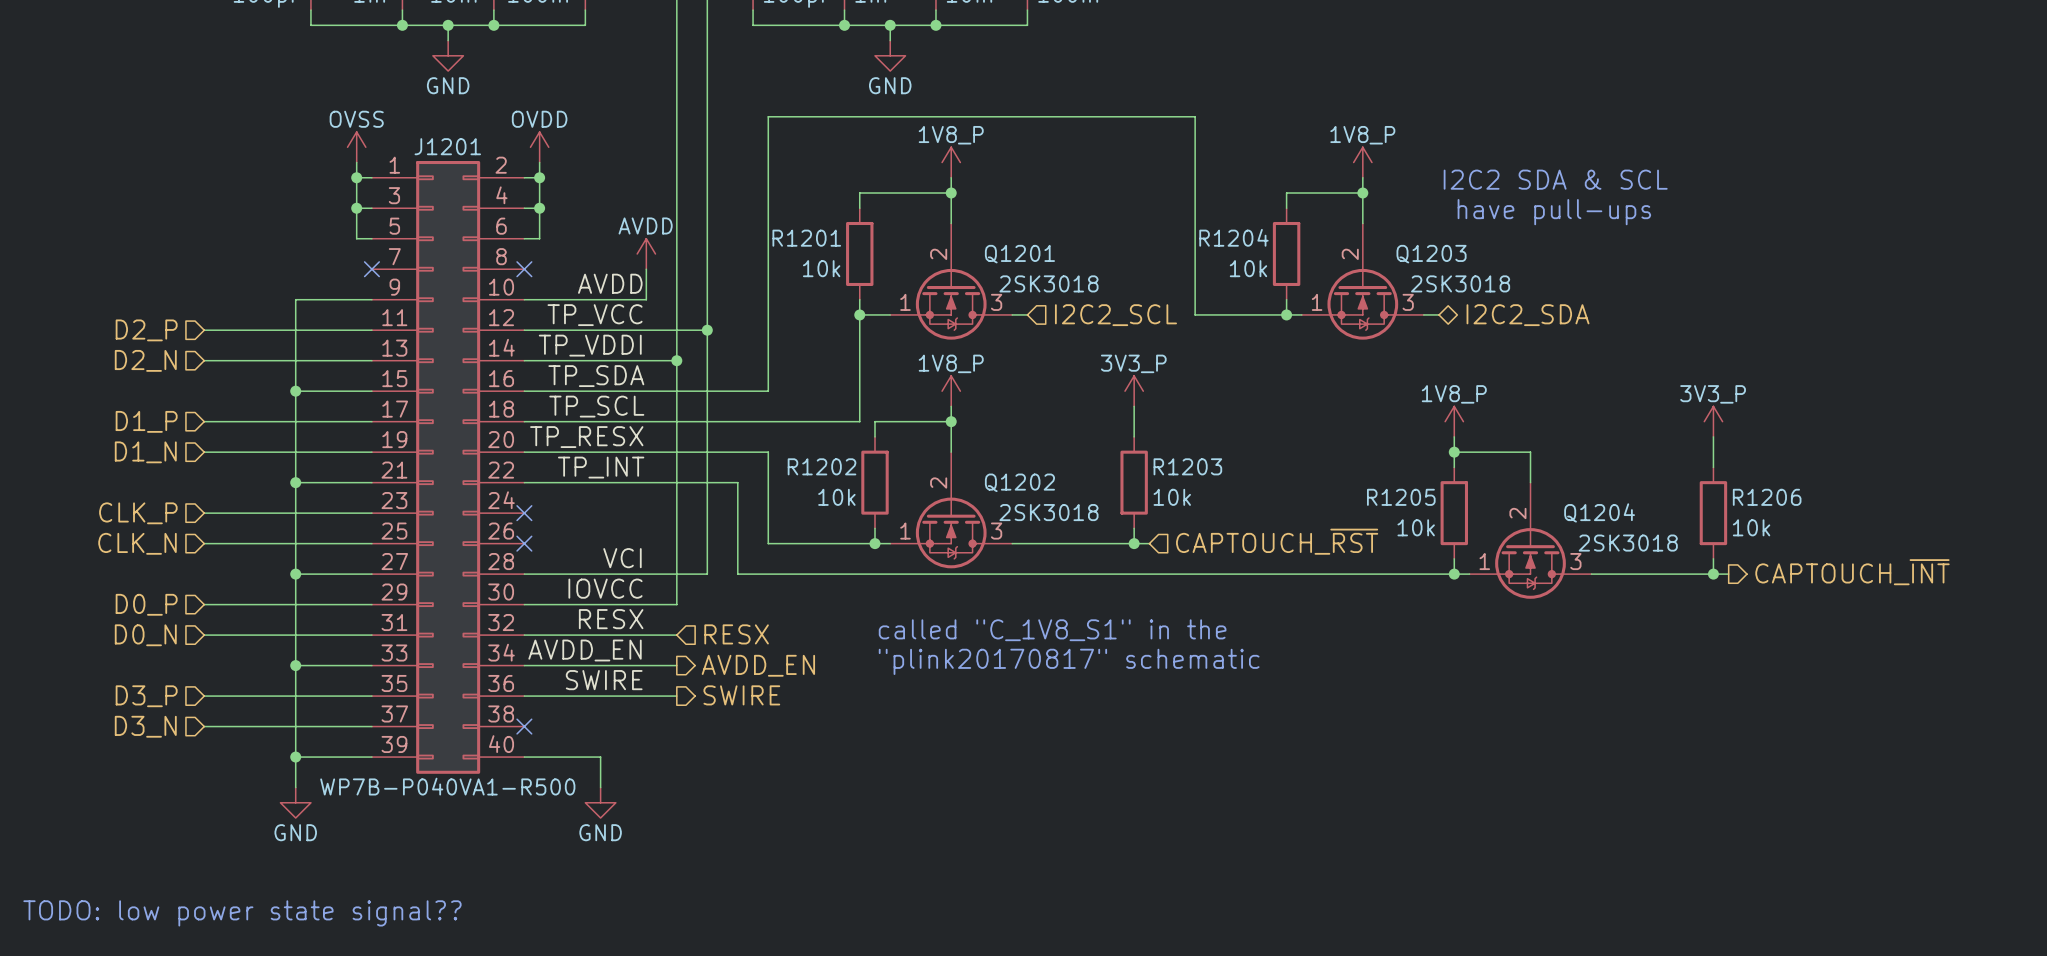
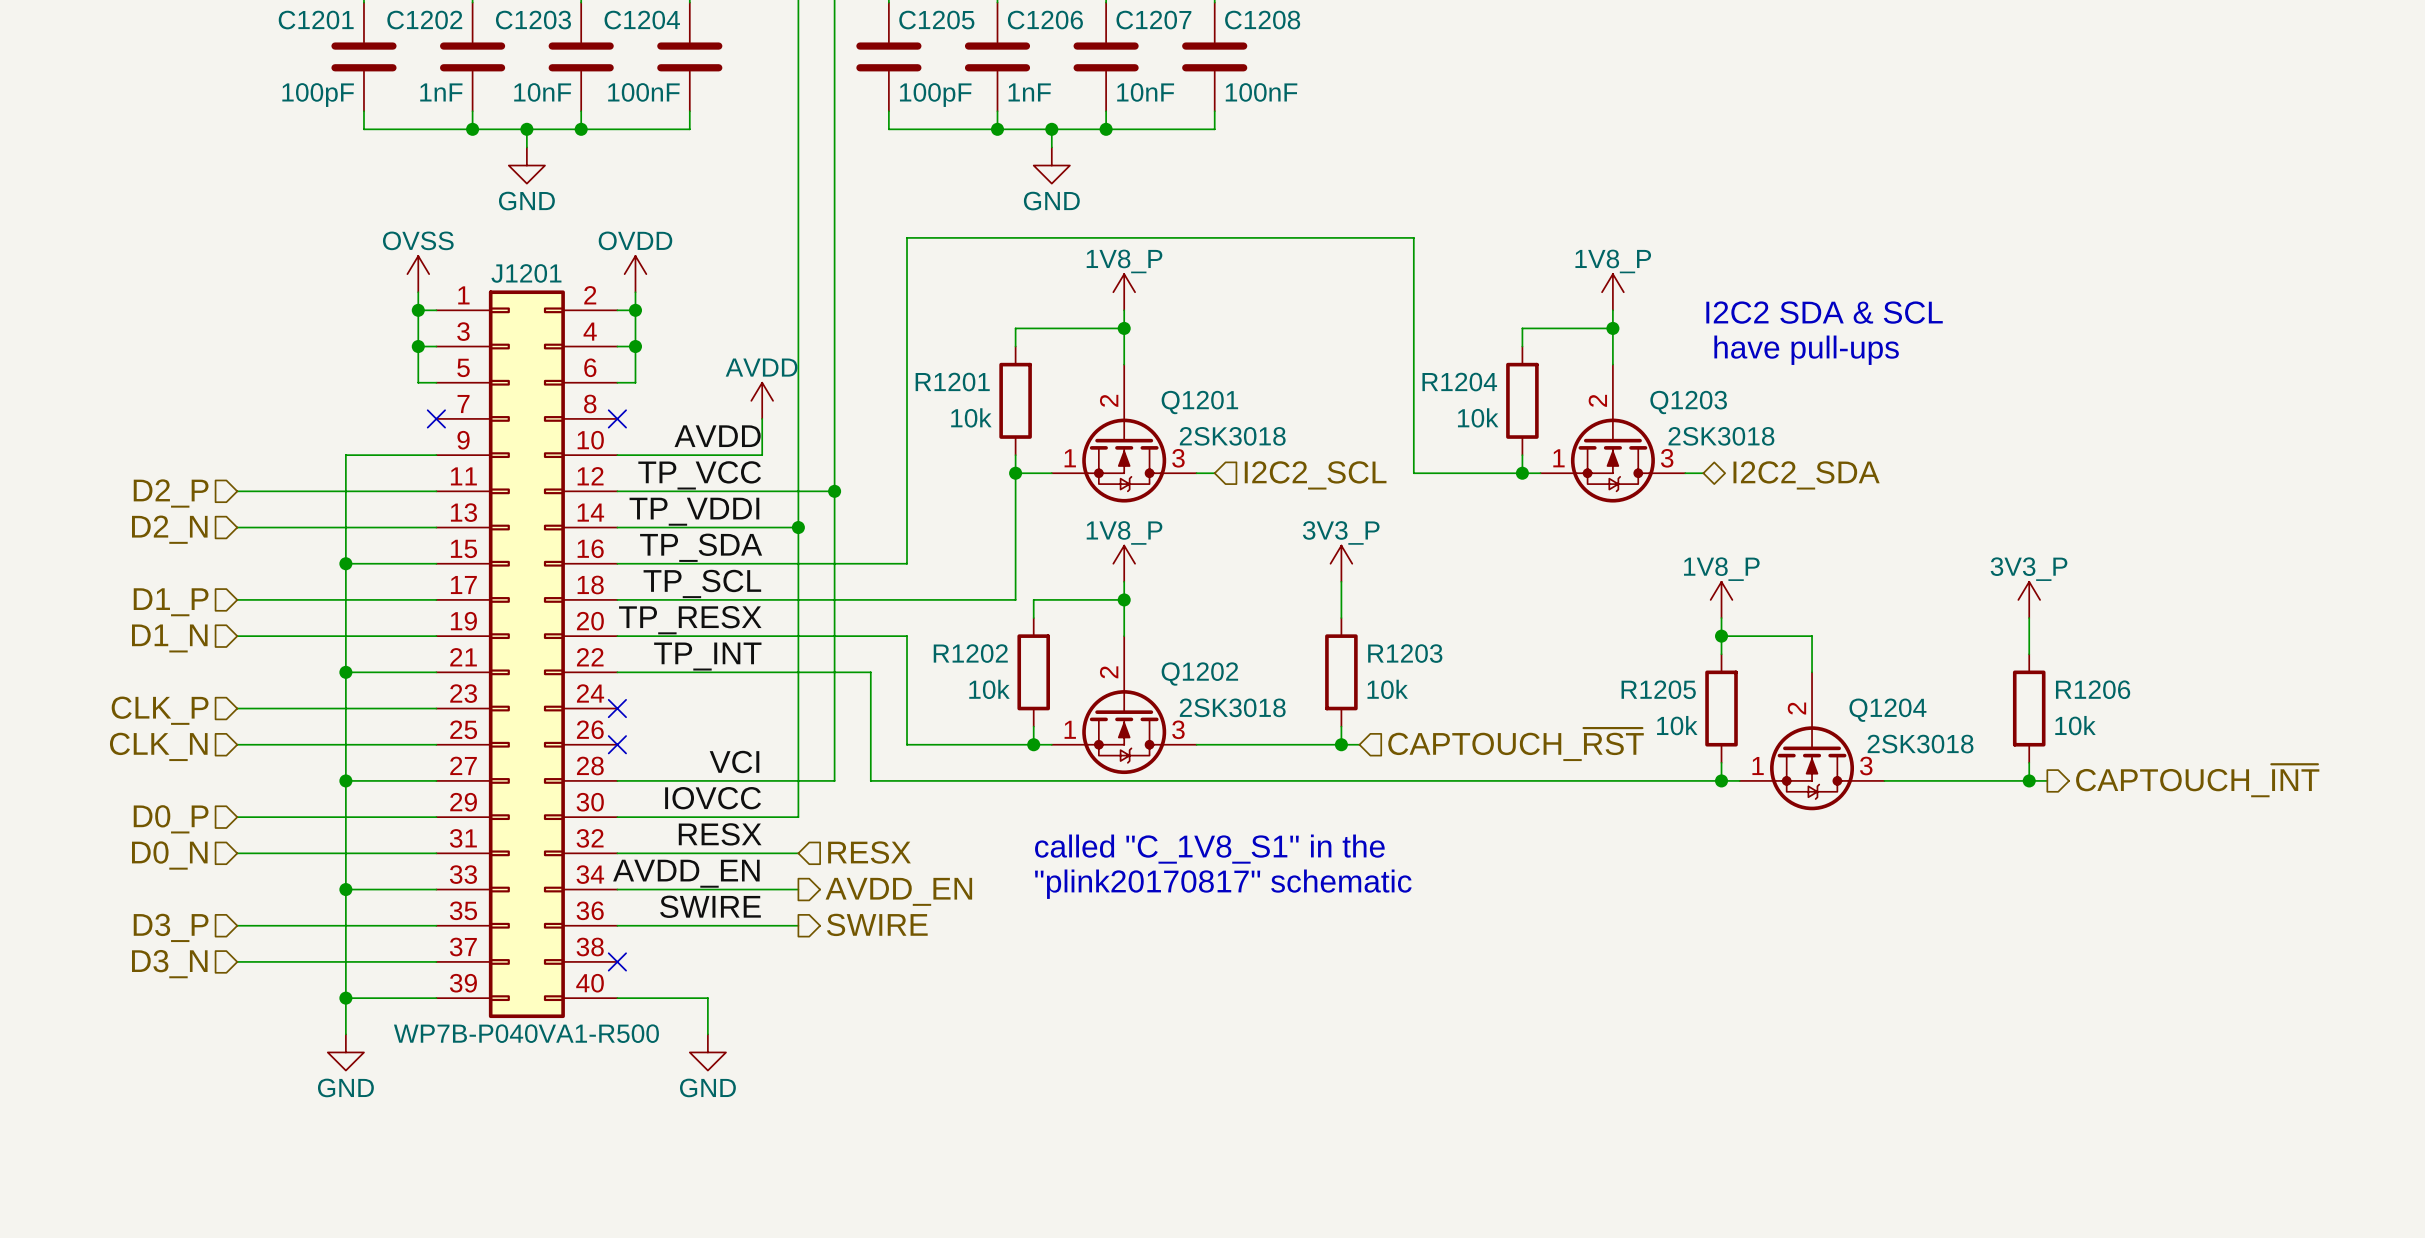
text: TODO: low power state signal?? (242, 913) -> none

